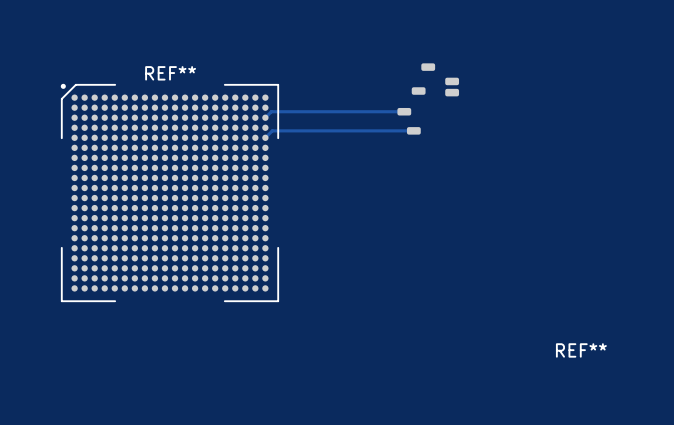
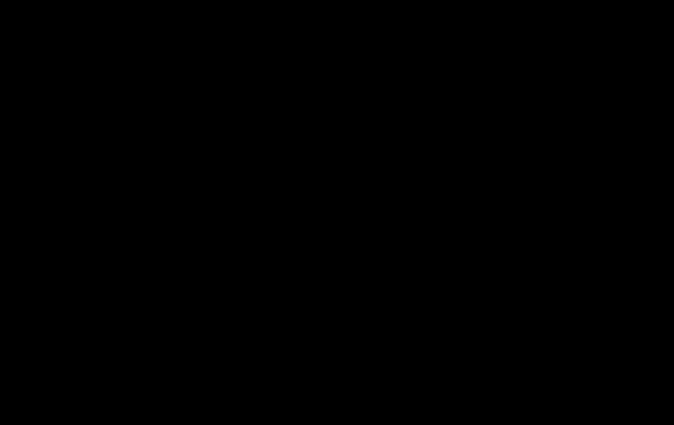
REF**: (428, 98) -> none
track: (404, 111) (271, 111) (265, 117) -> none
track: (413, 130) (272, 130) (265, 137) -> none
REF**: (169, 192) -> none

